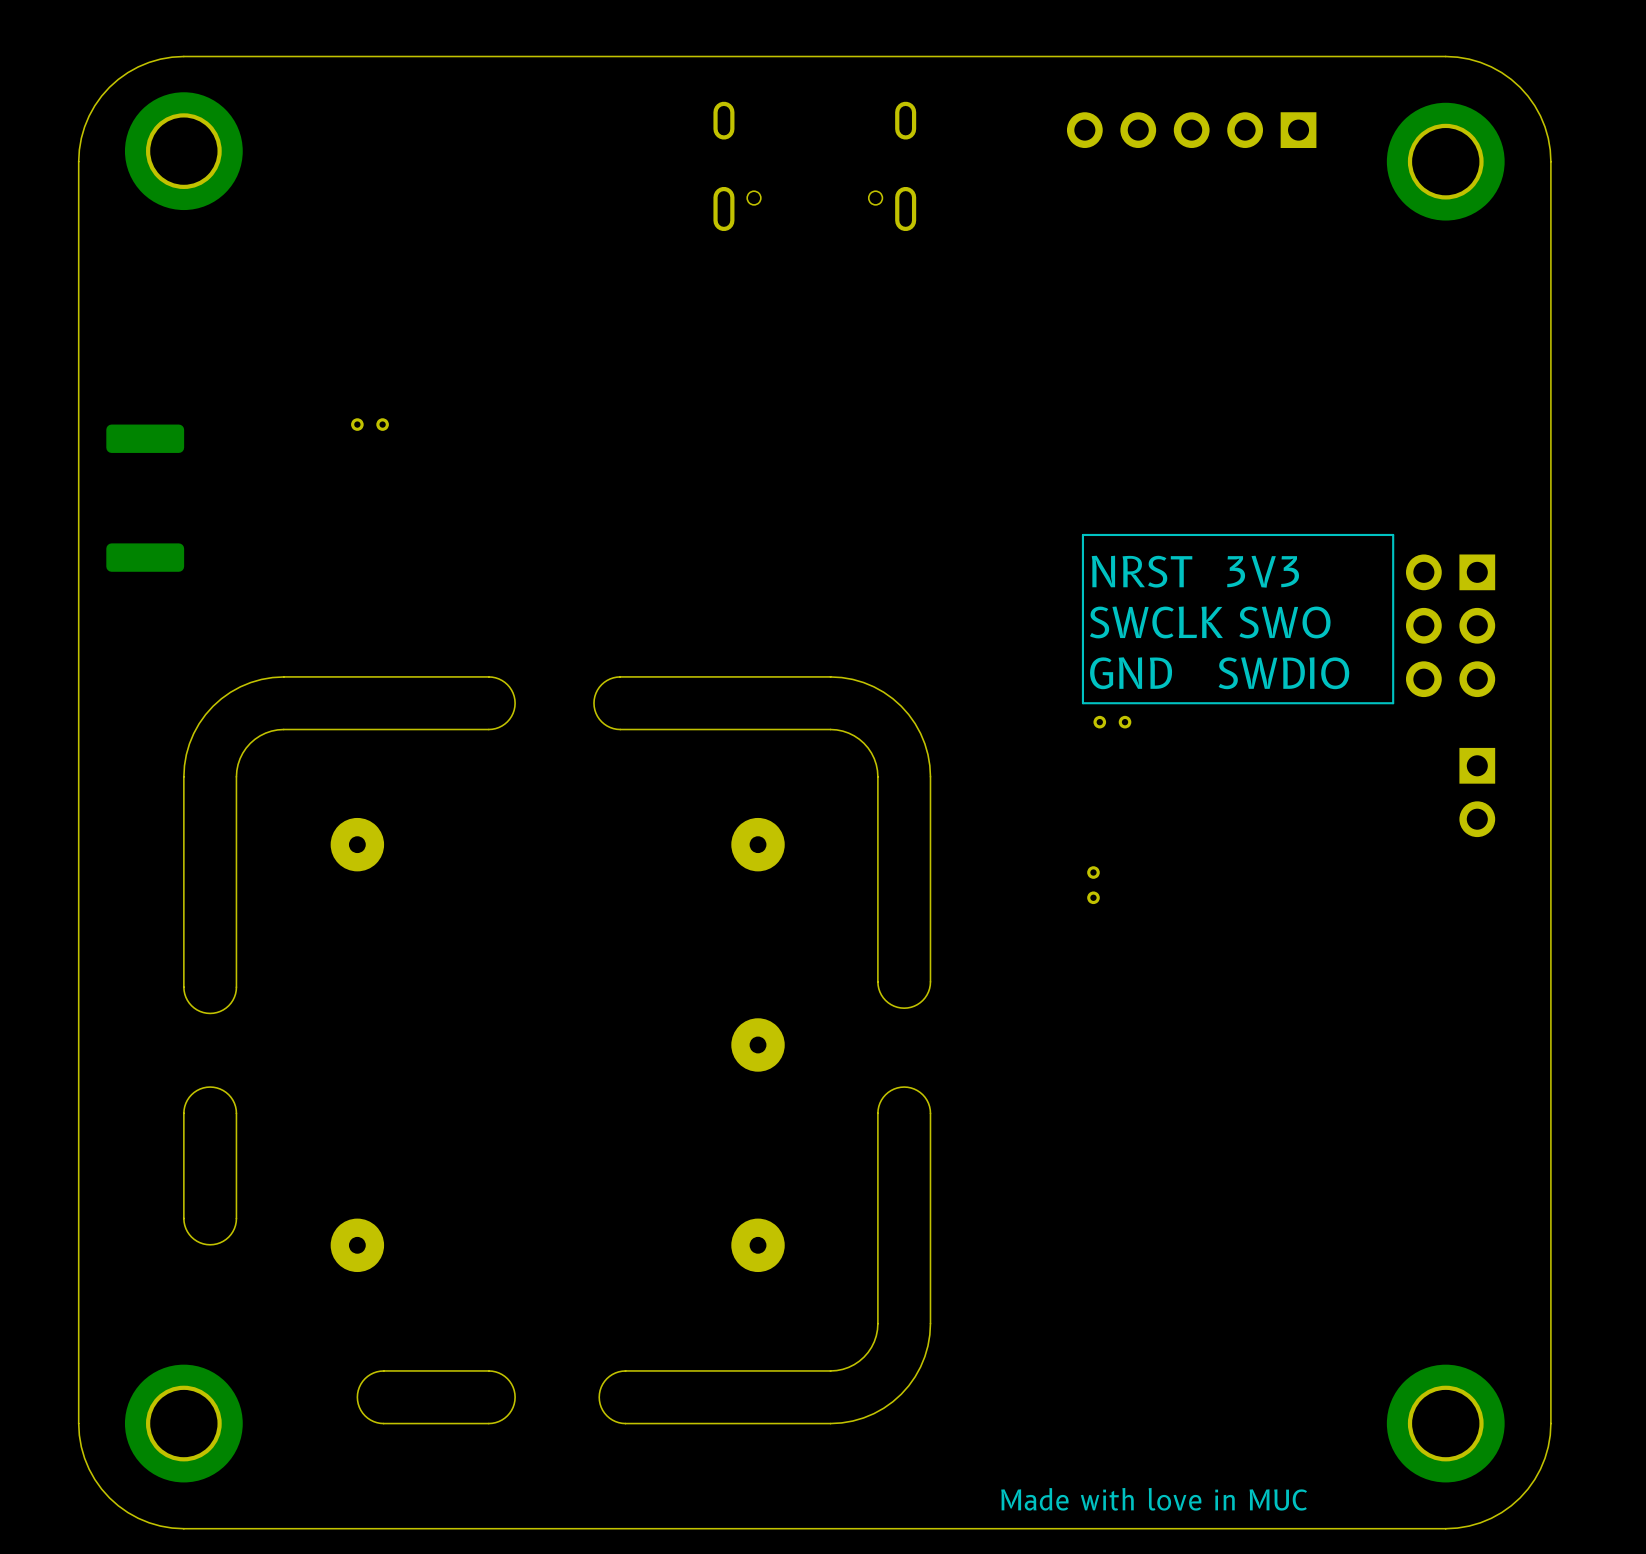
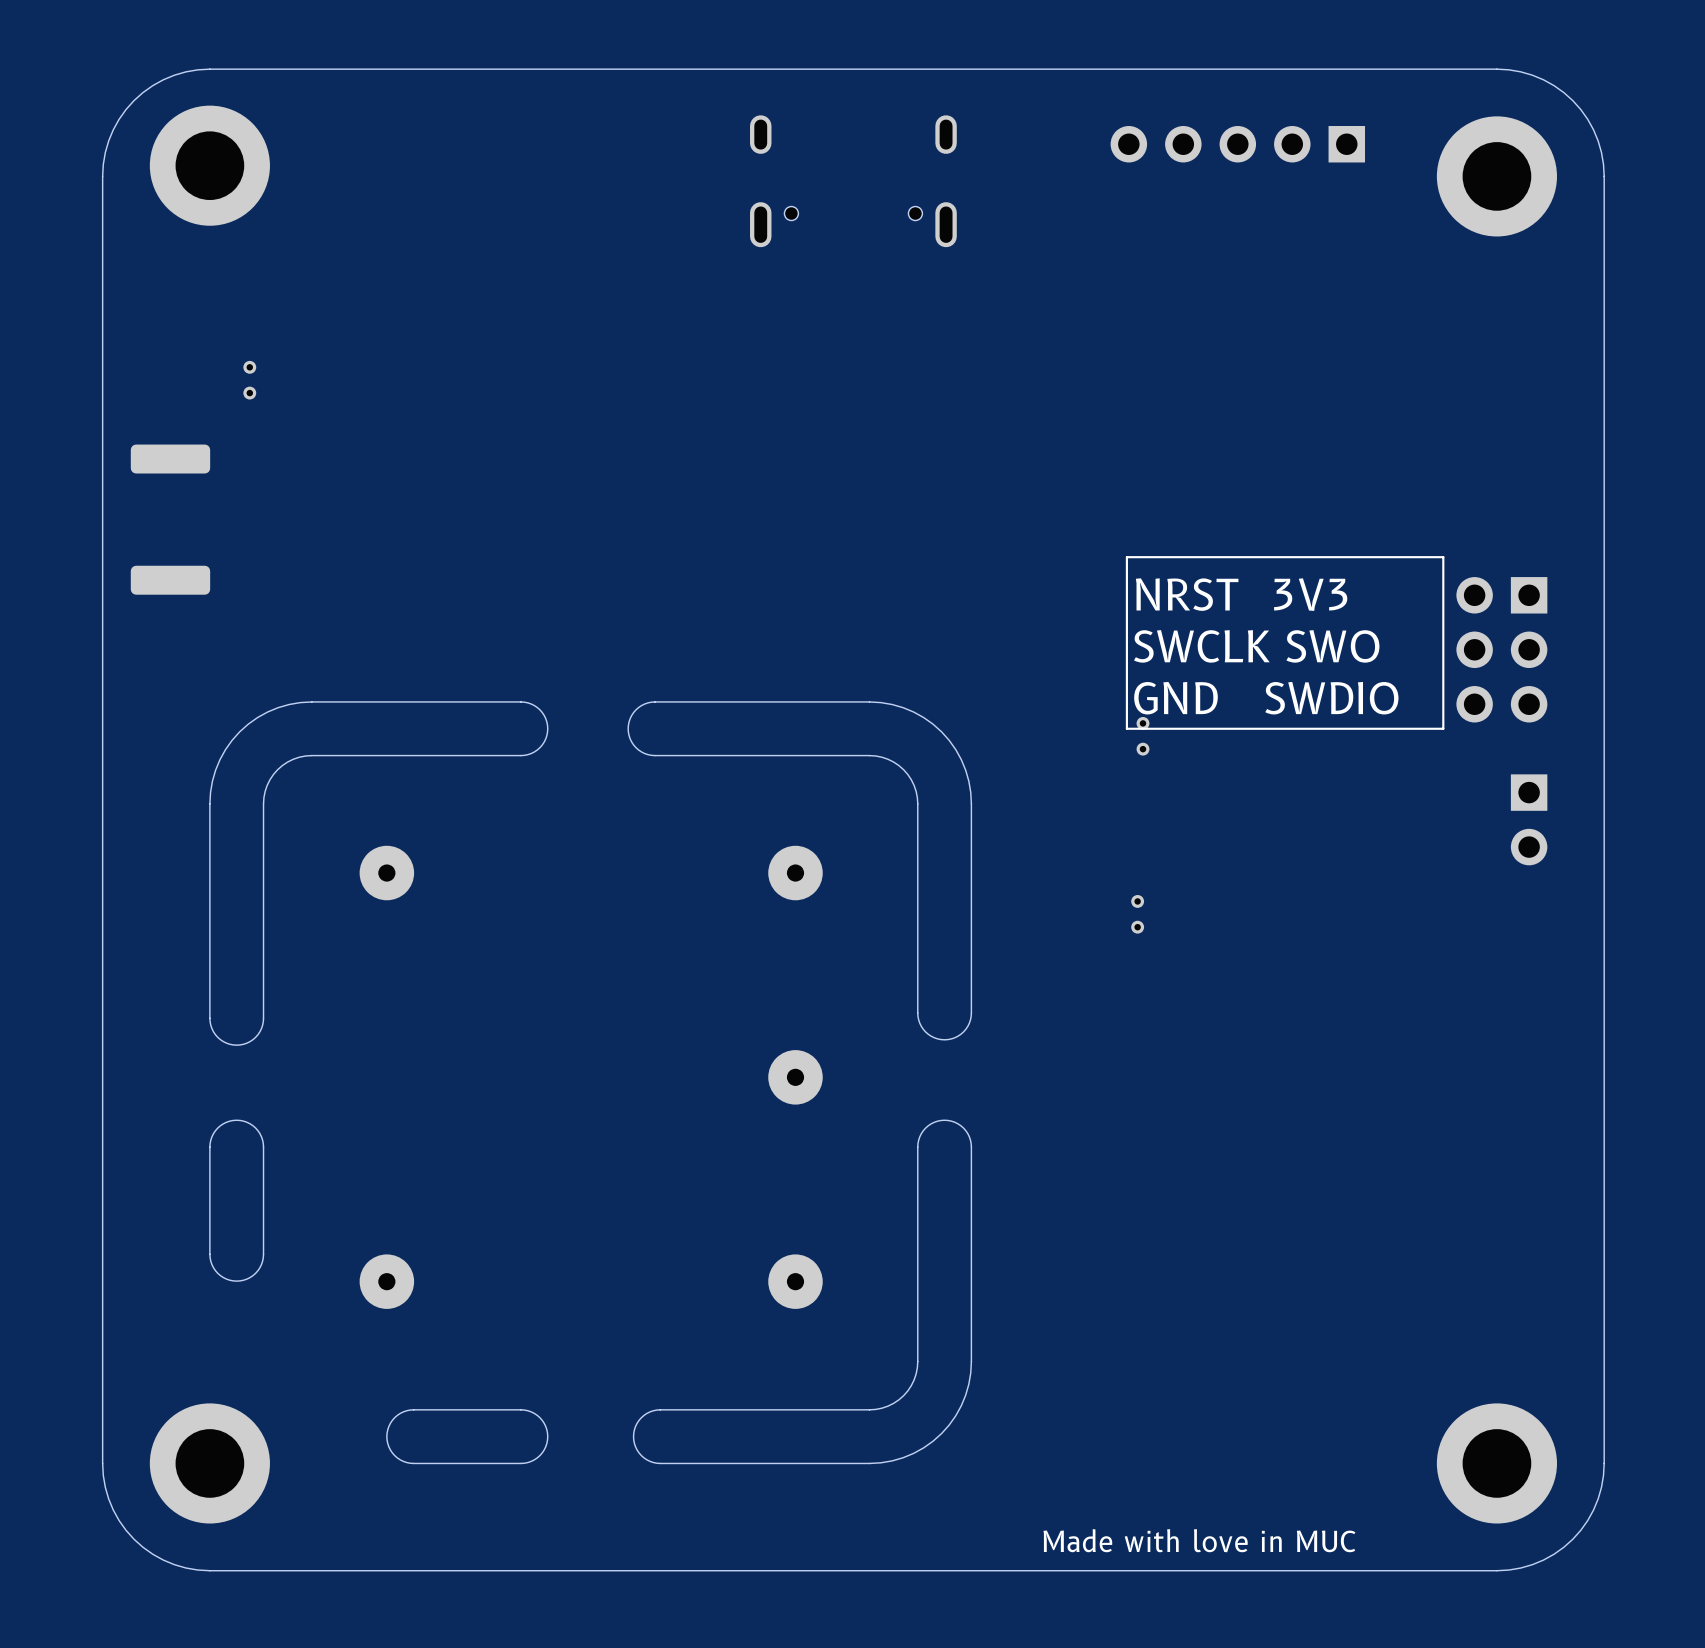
part rotation: 0° (369, 424) -> 90° clockwise (249, 380)
part position: (369, 424) -> (249, 380)
part rotation: 0° (1112, 722) -> 90° clockwise (1143, 736)

